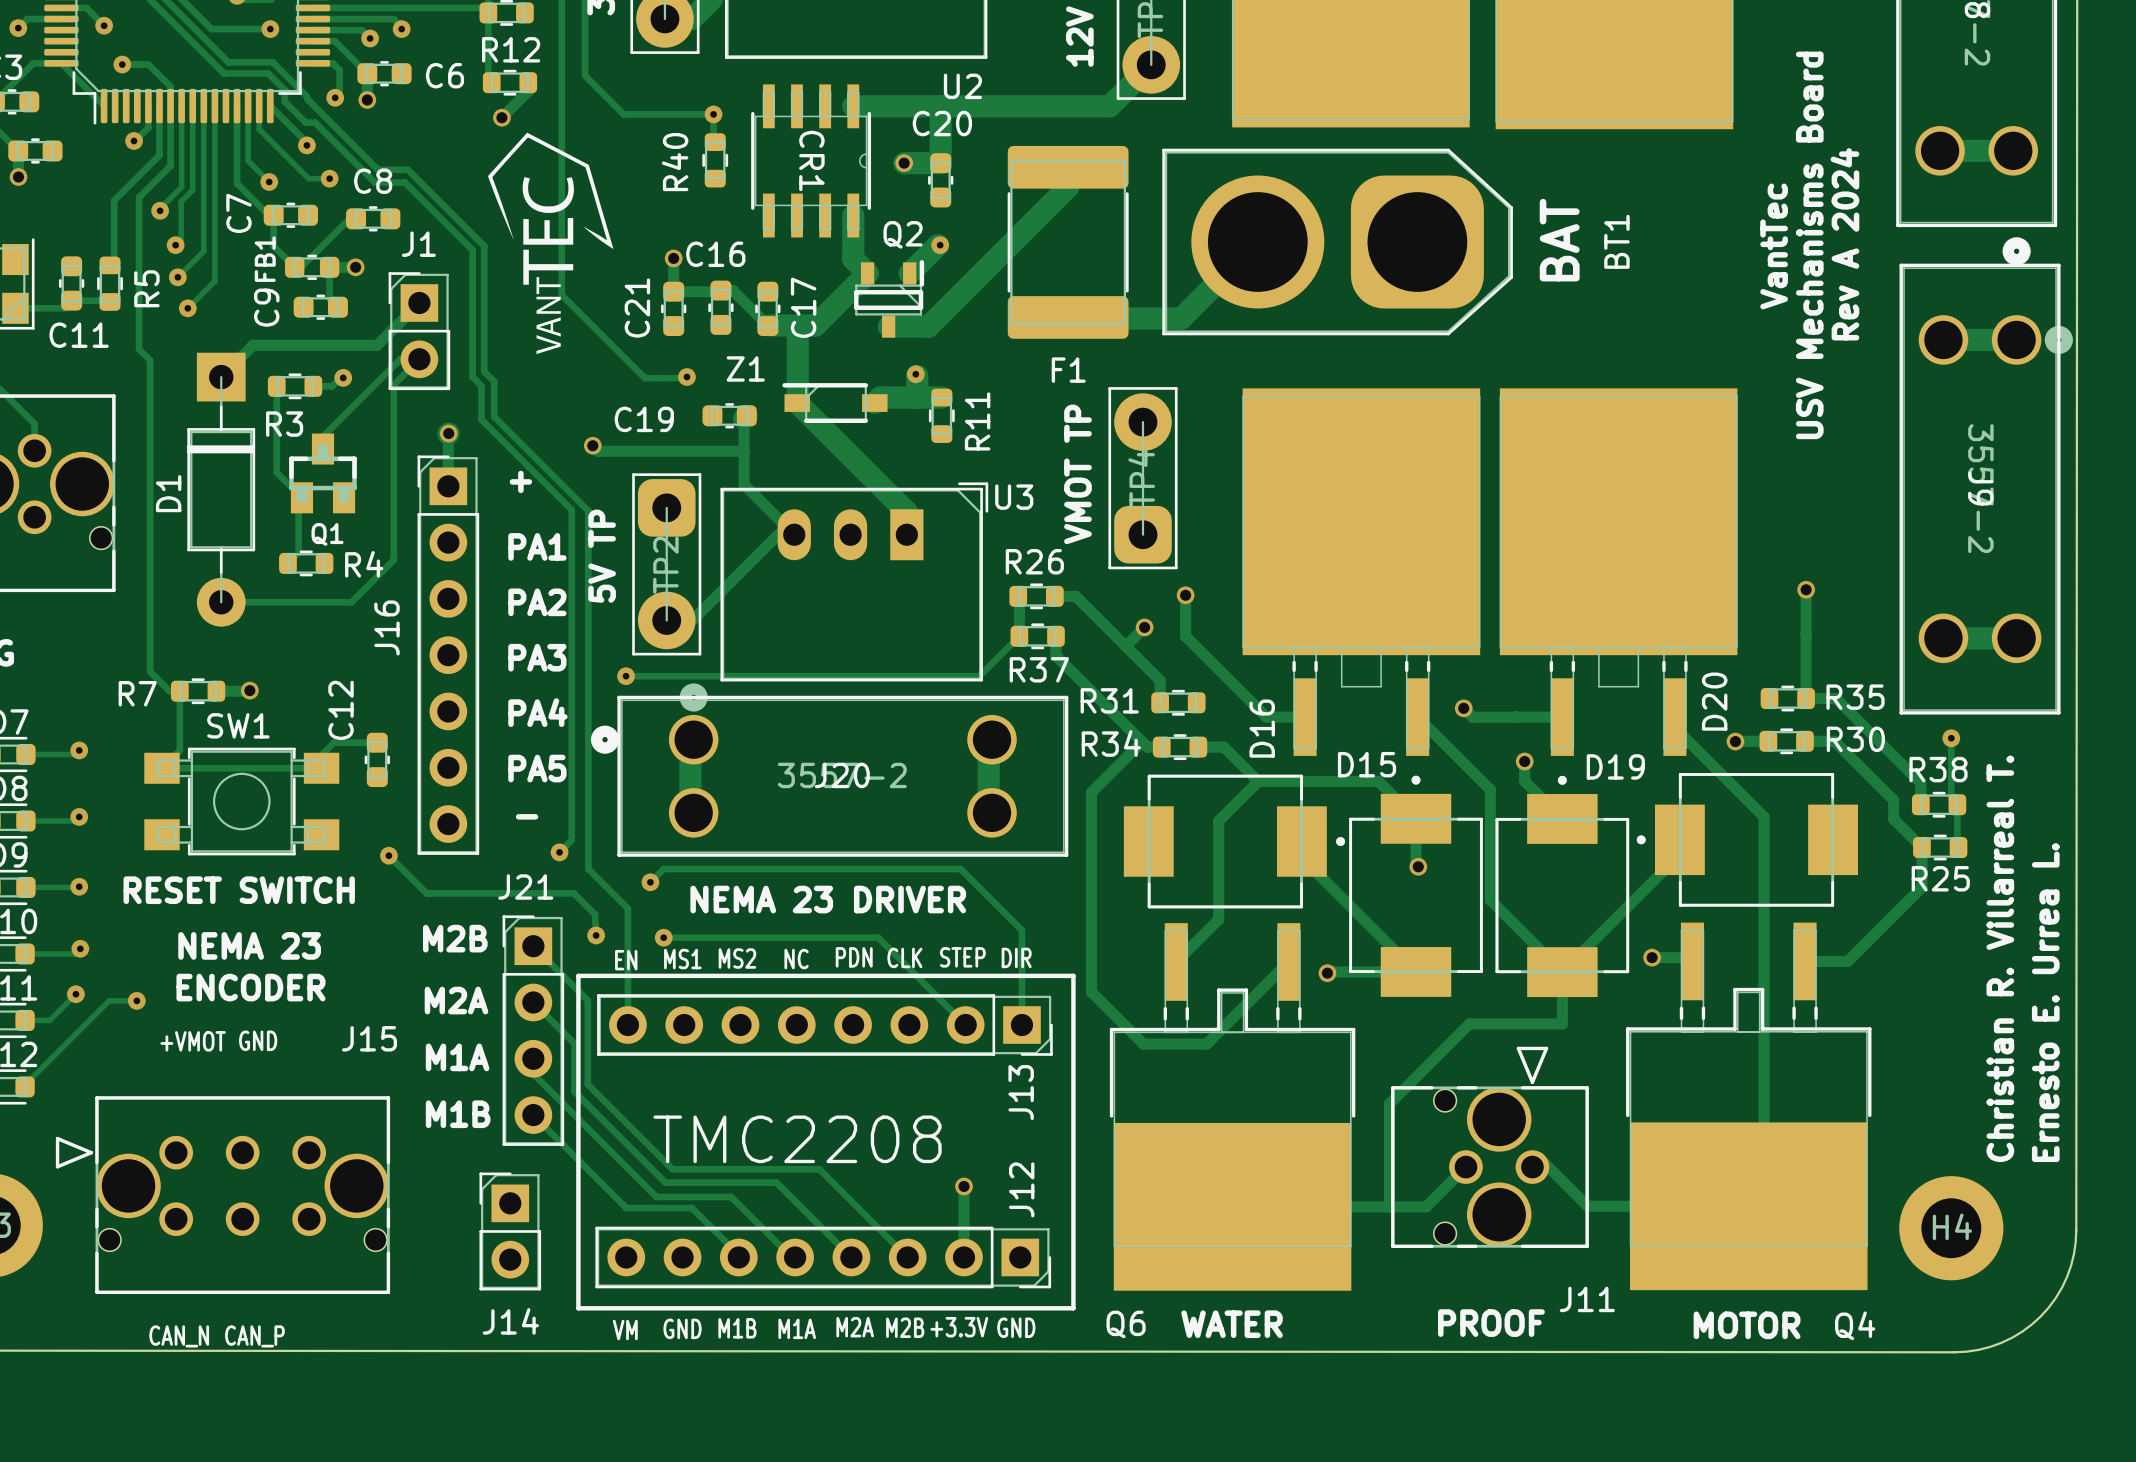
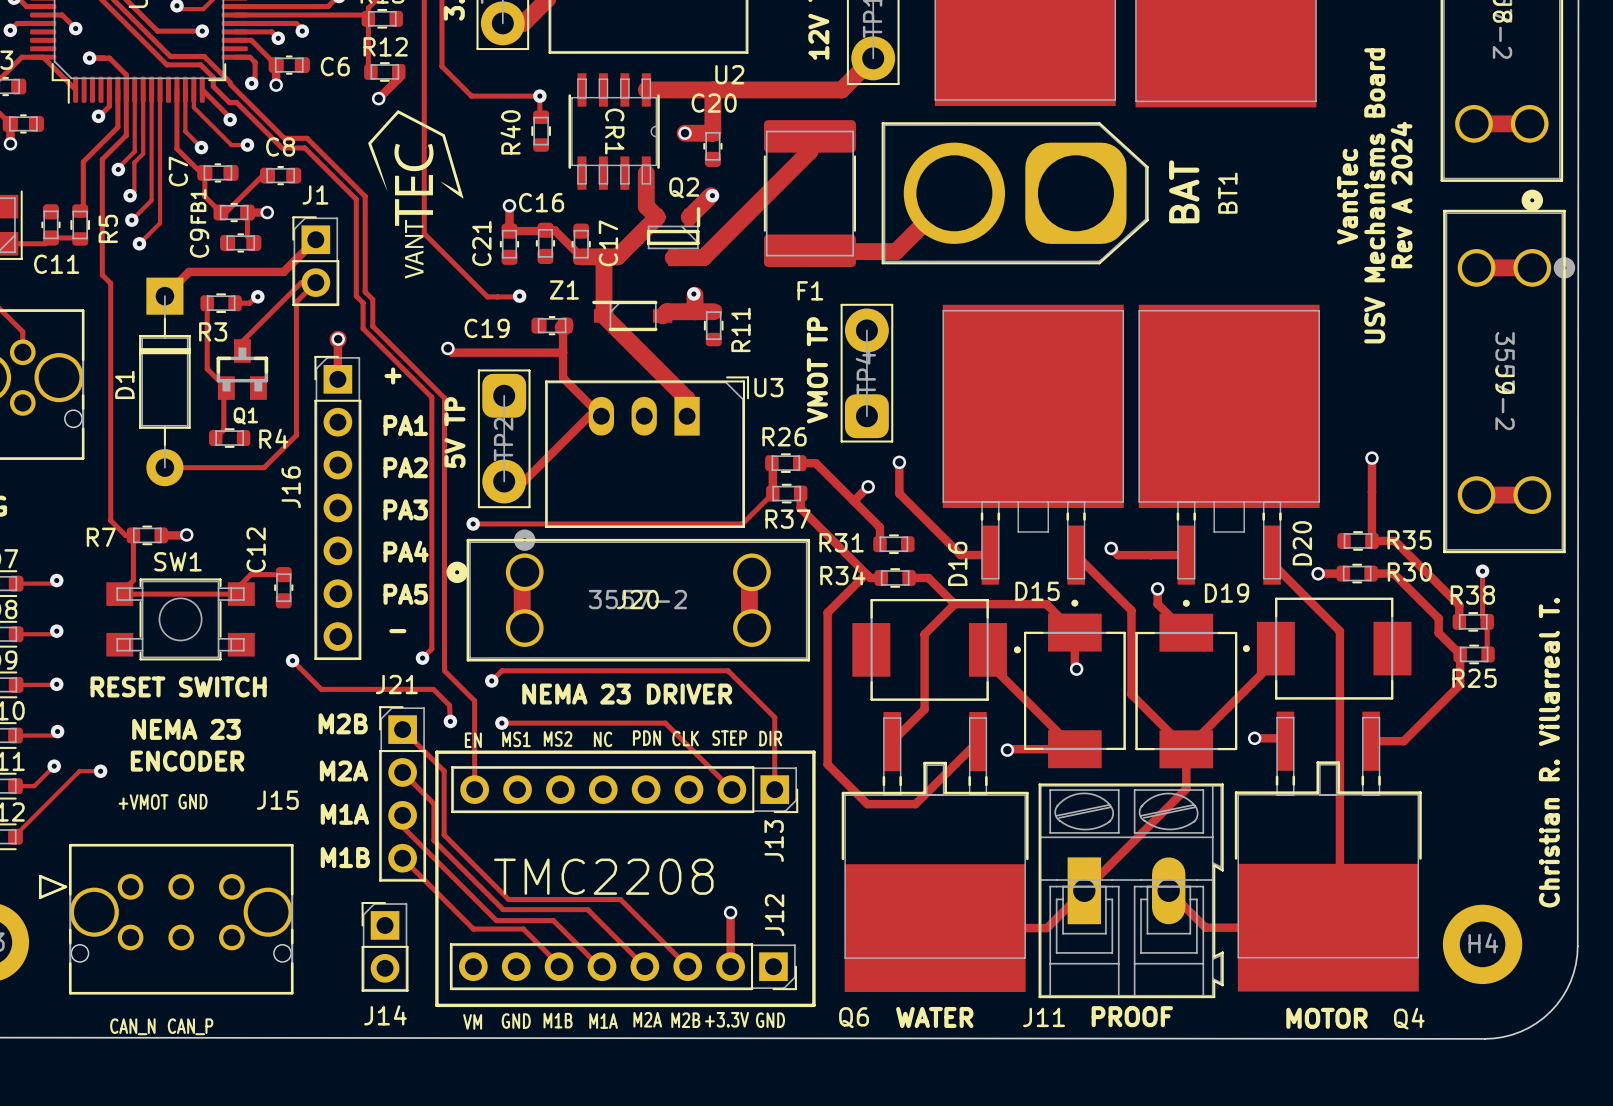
text position: Christian R. Villarreal T. (2000, 958) -> Christian R. Villarreal T. (1549, 752)
text: Ernesto E. Urrea L. (2045, 1002) -> none
track: (1562, 1023) (1469, 1023) (1389, 1103) (1389, 1206) -> (1186, 788) (1047, 928)
J11 footprint: [1391, 1046, 1589, 1248] -> [1038, 783, 1224, 999]
track: (1465, 1167) (1426, 1206) (1379, 1206) -> none
J11 name position: J11 (1587, 1299) -> J11 (1044, 1017)

